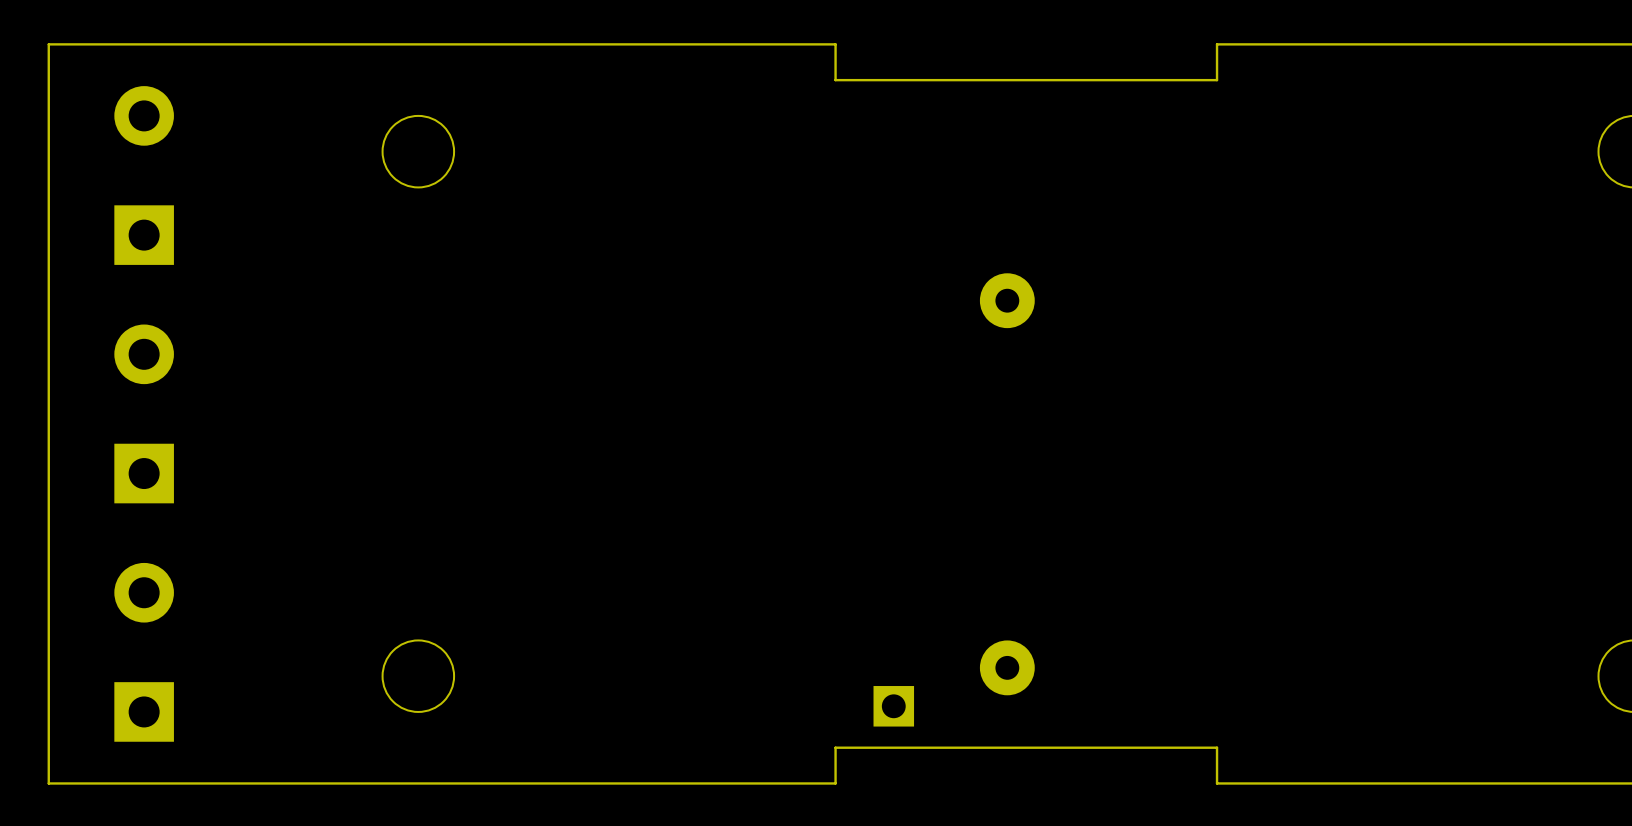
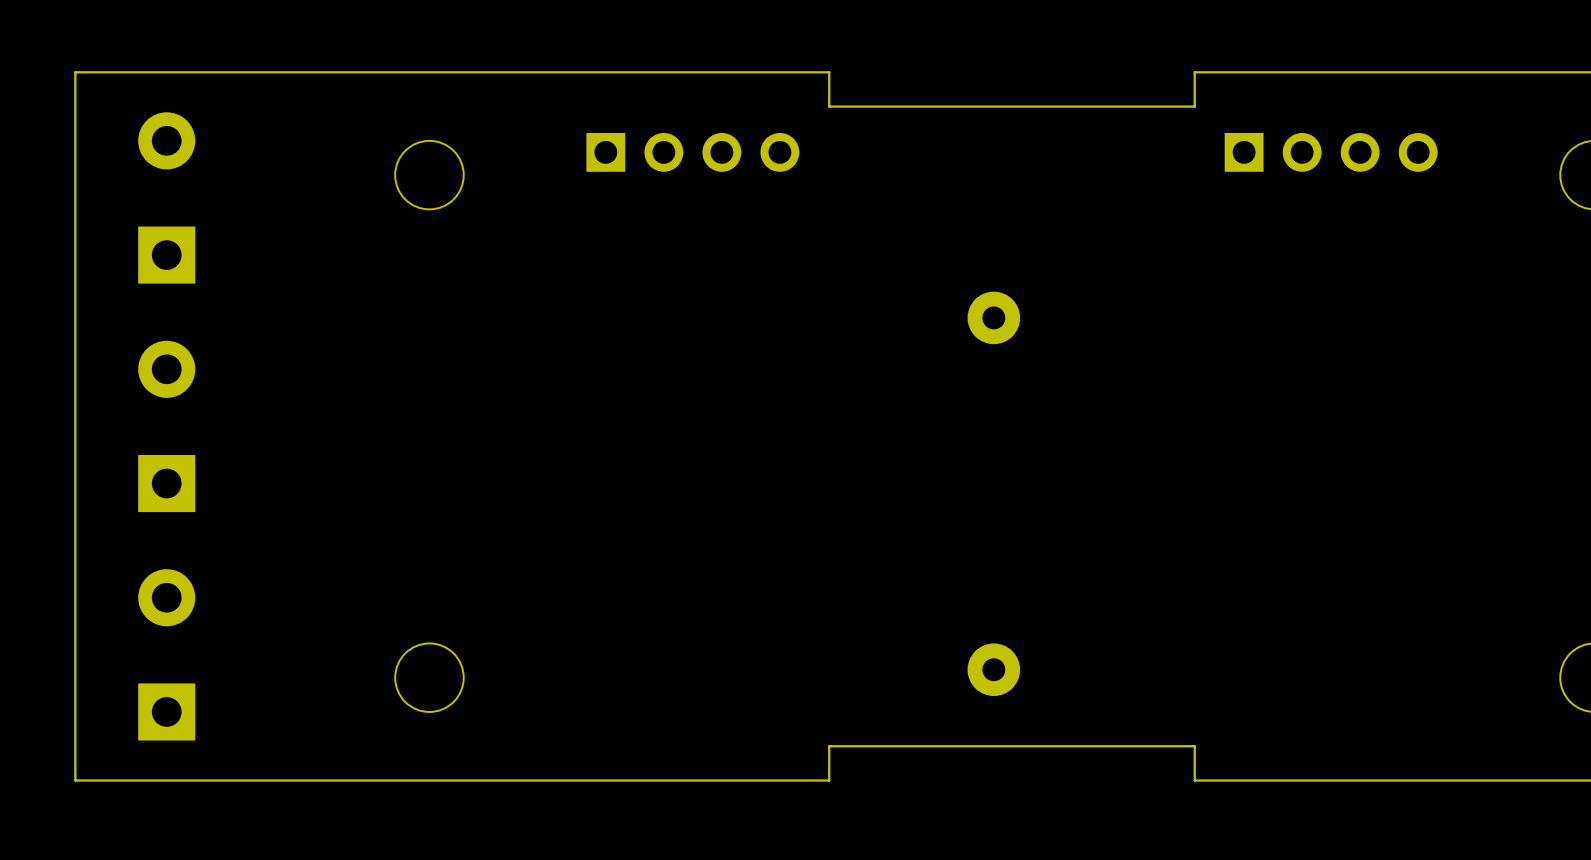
part: none -> (692, 152)
part: none -> (1331, 152)
part: (893, 706) -> none

